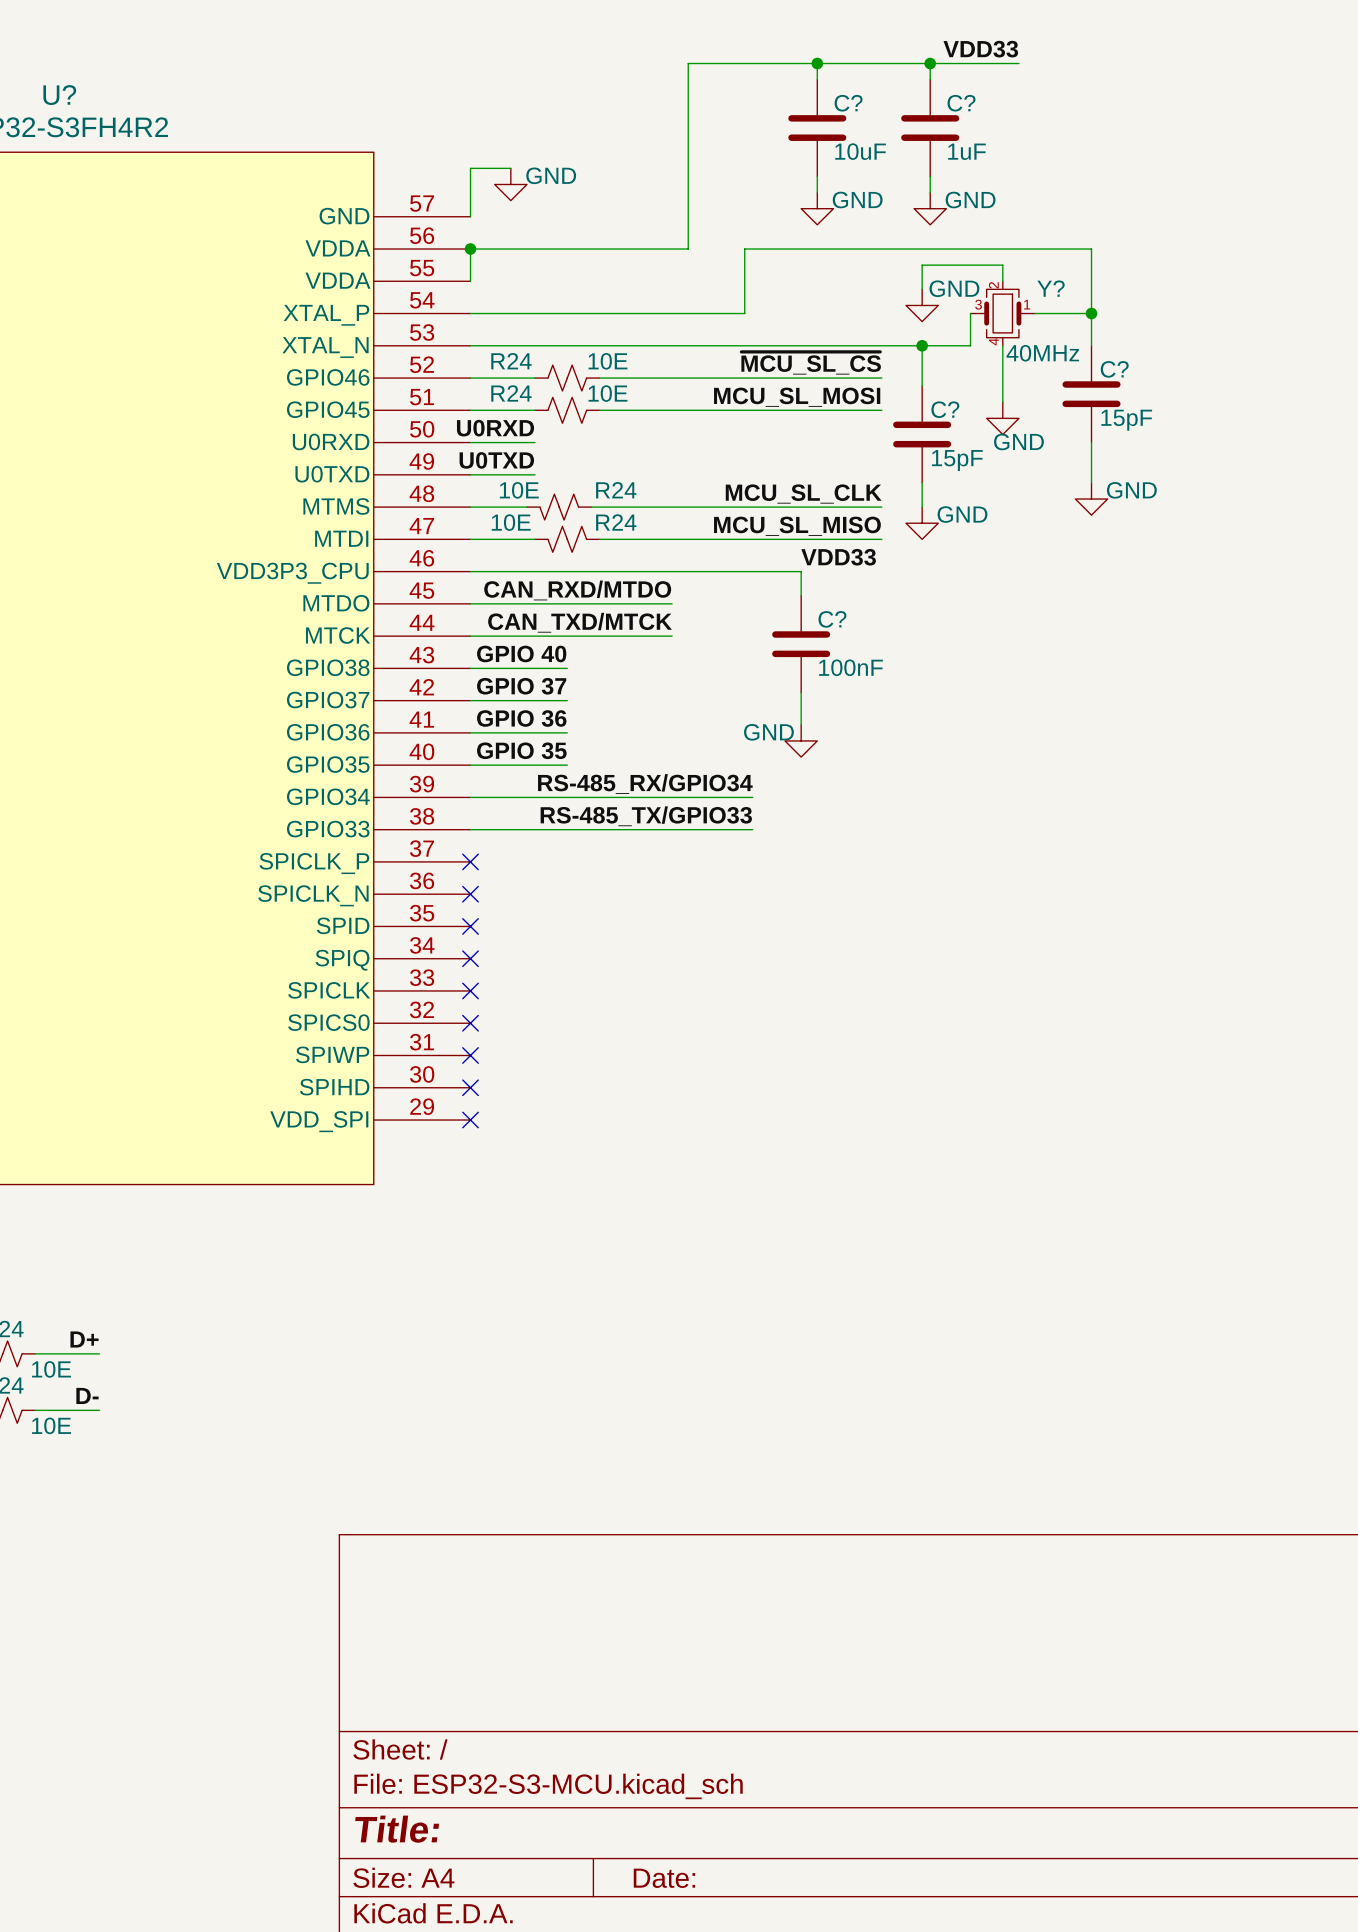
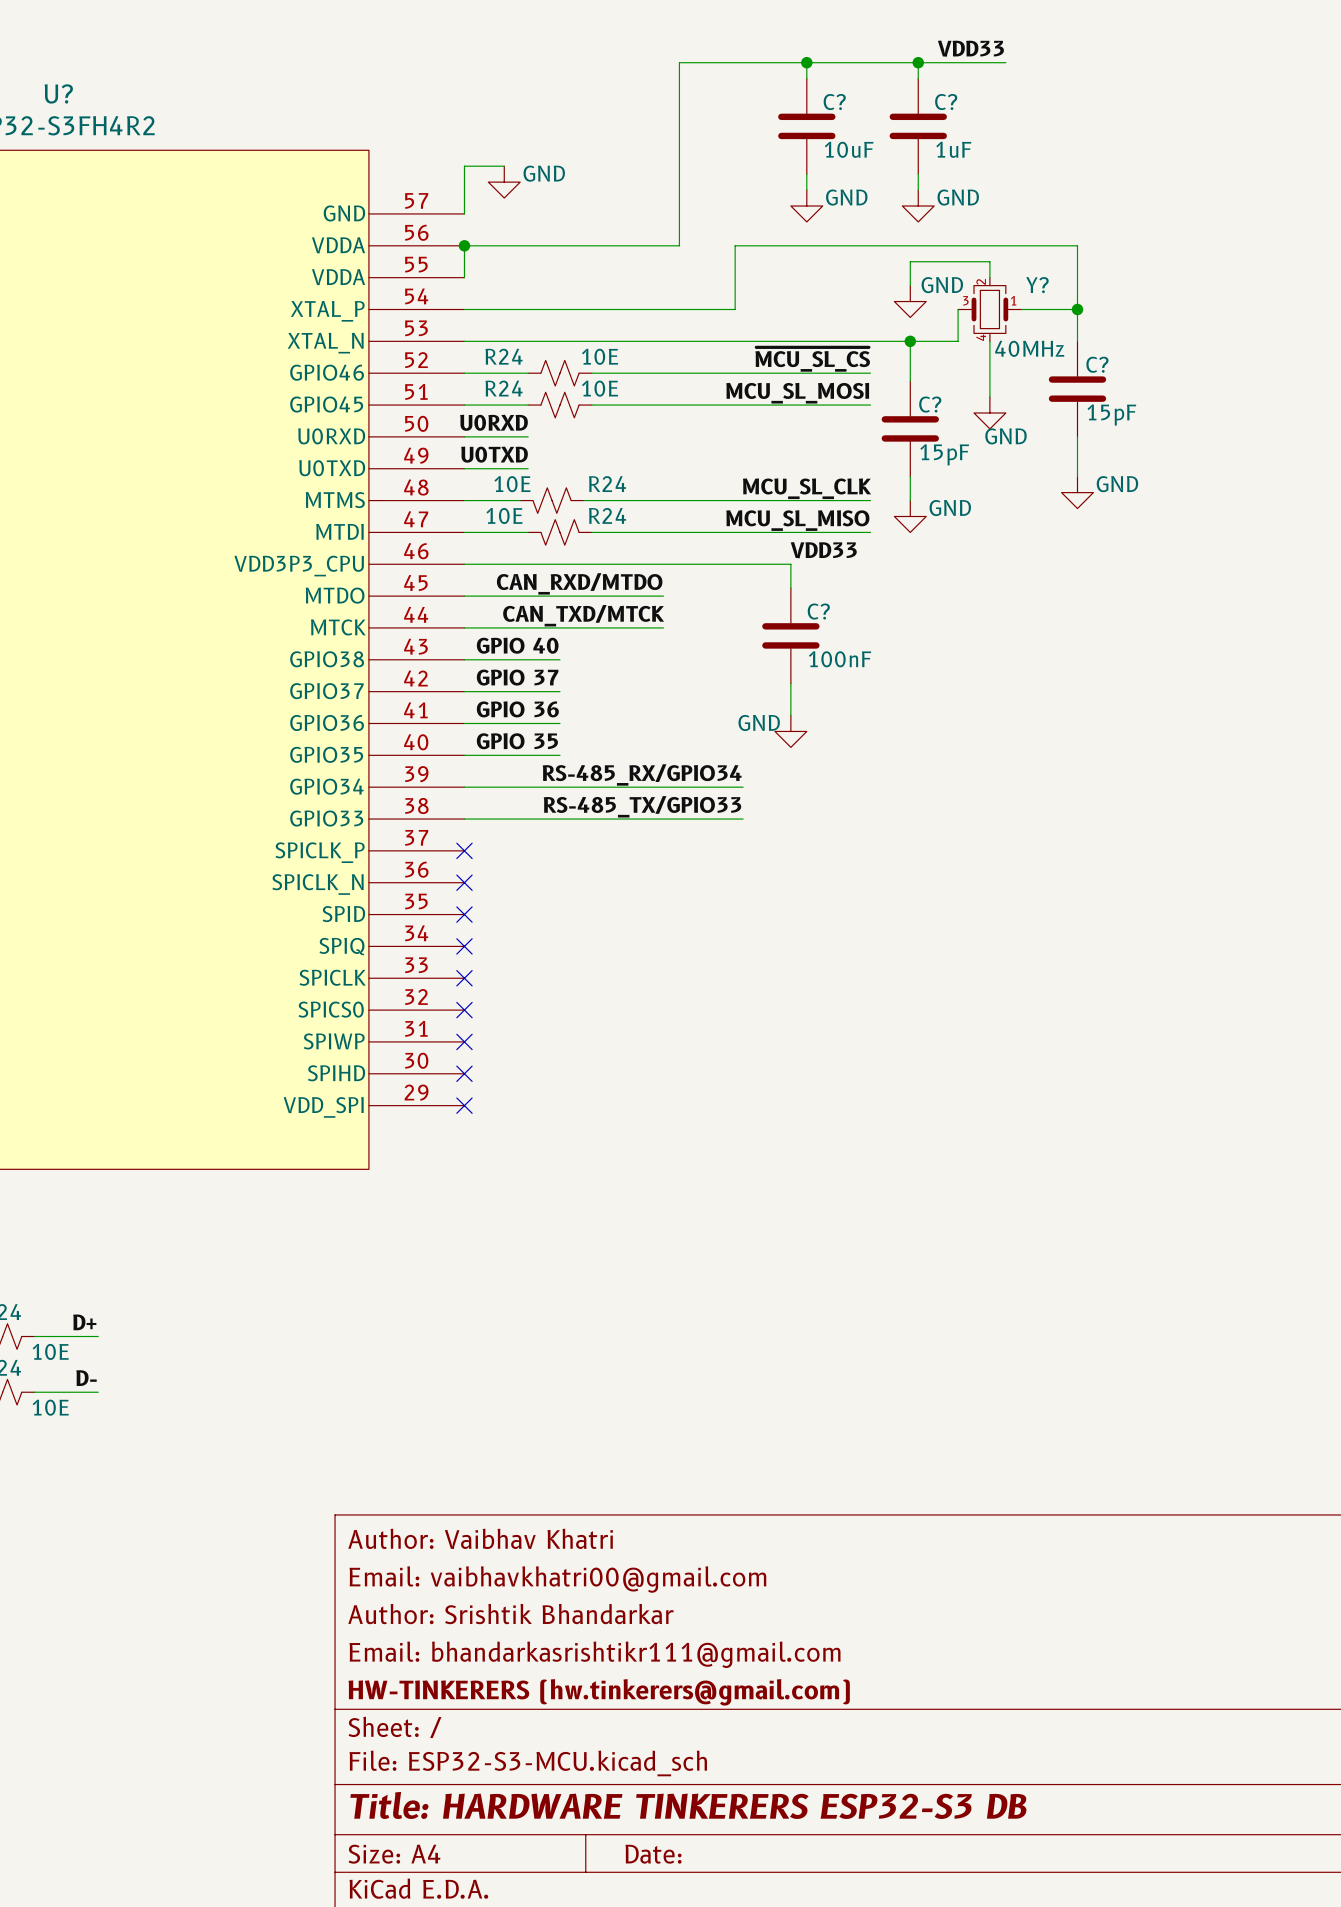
title block: none -> Author: Vaibhav Khatri (480, 1538)
title block: none -> Email: vaibhavkhatri00@gmail.com (557, 1579)
title block: none -> Author: Srishtik Bhandarkar (510, 1614)
title block: none -> Email: bhandarkasrishtikr111@gmail.com (595, 1654)
title block: none -> HW-TINKERERS (hw.tinkerers@gmail.com) (599, 1692)
title block: Title: (397, 1829) -> Title: HARDWARE TINKERERS ESP32-S3 DB (688, 1805)

